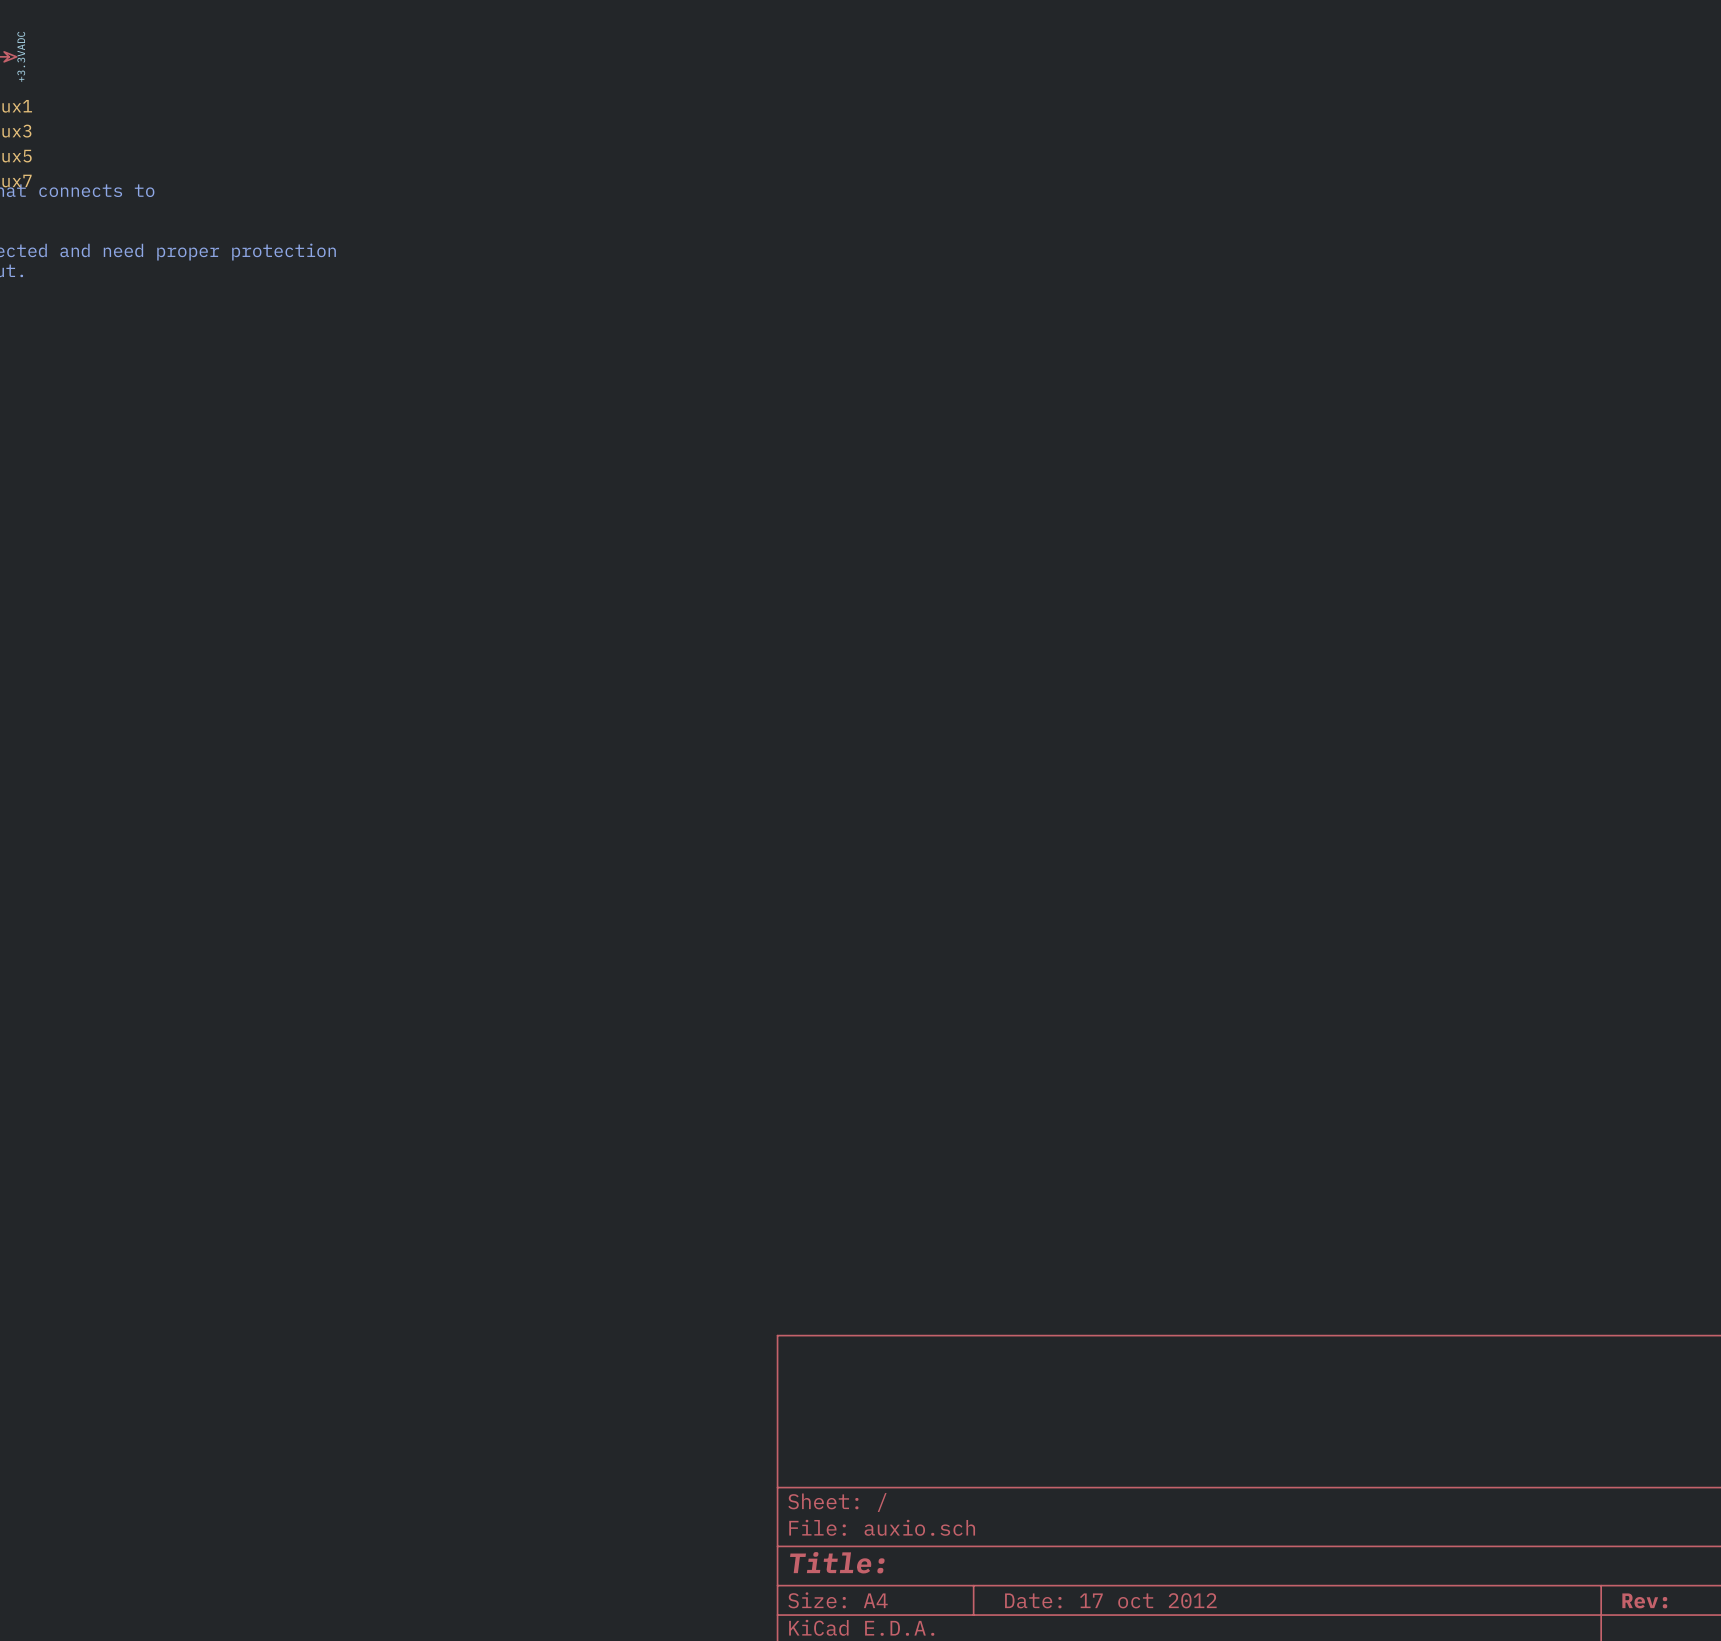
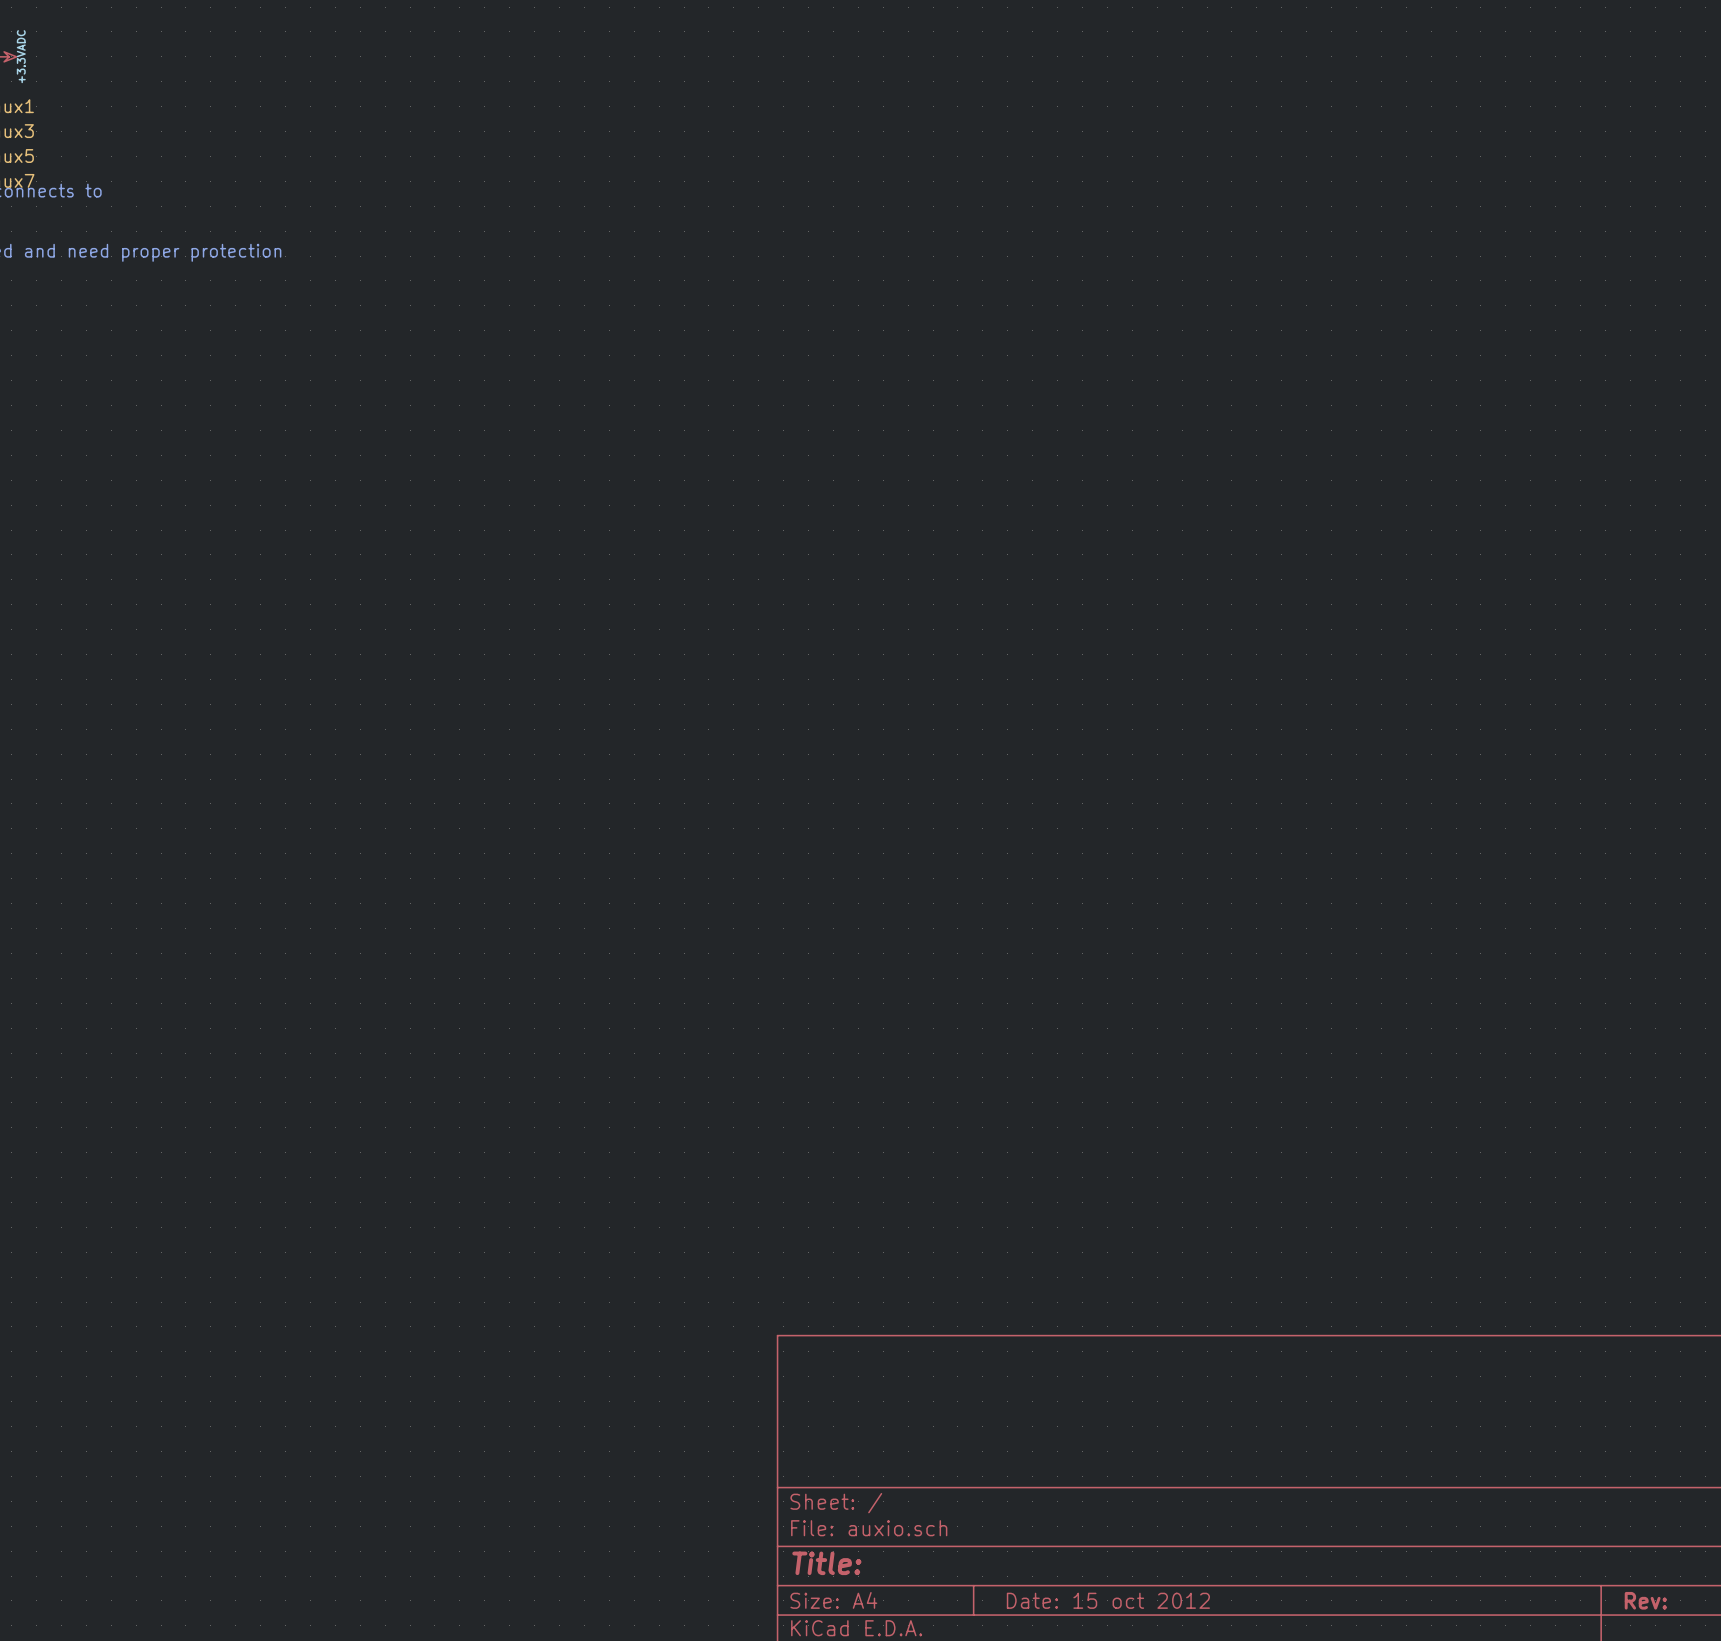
title block: Date: 17 oct 2012 (1110, 1600) -> Date: 15 oct 2012 (1108, 1600)

